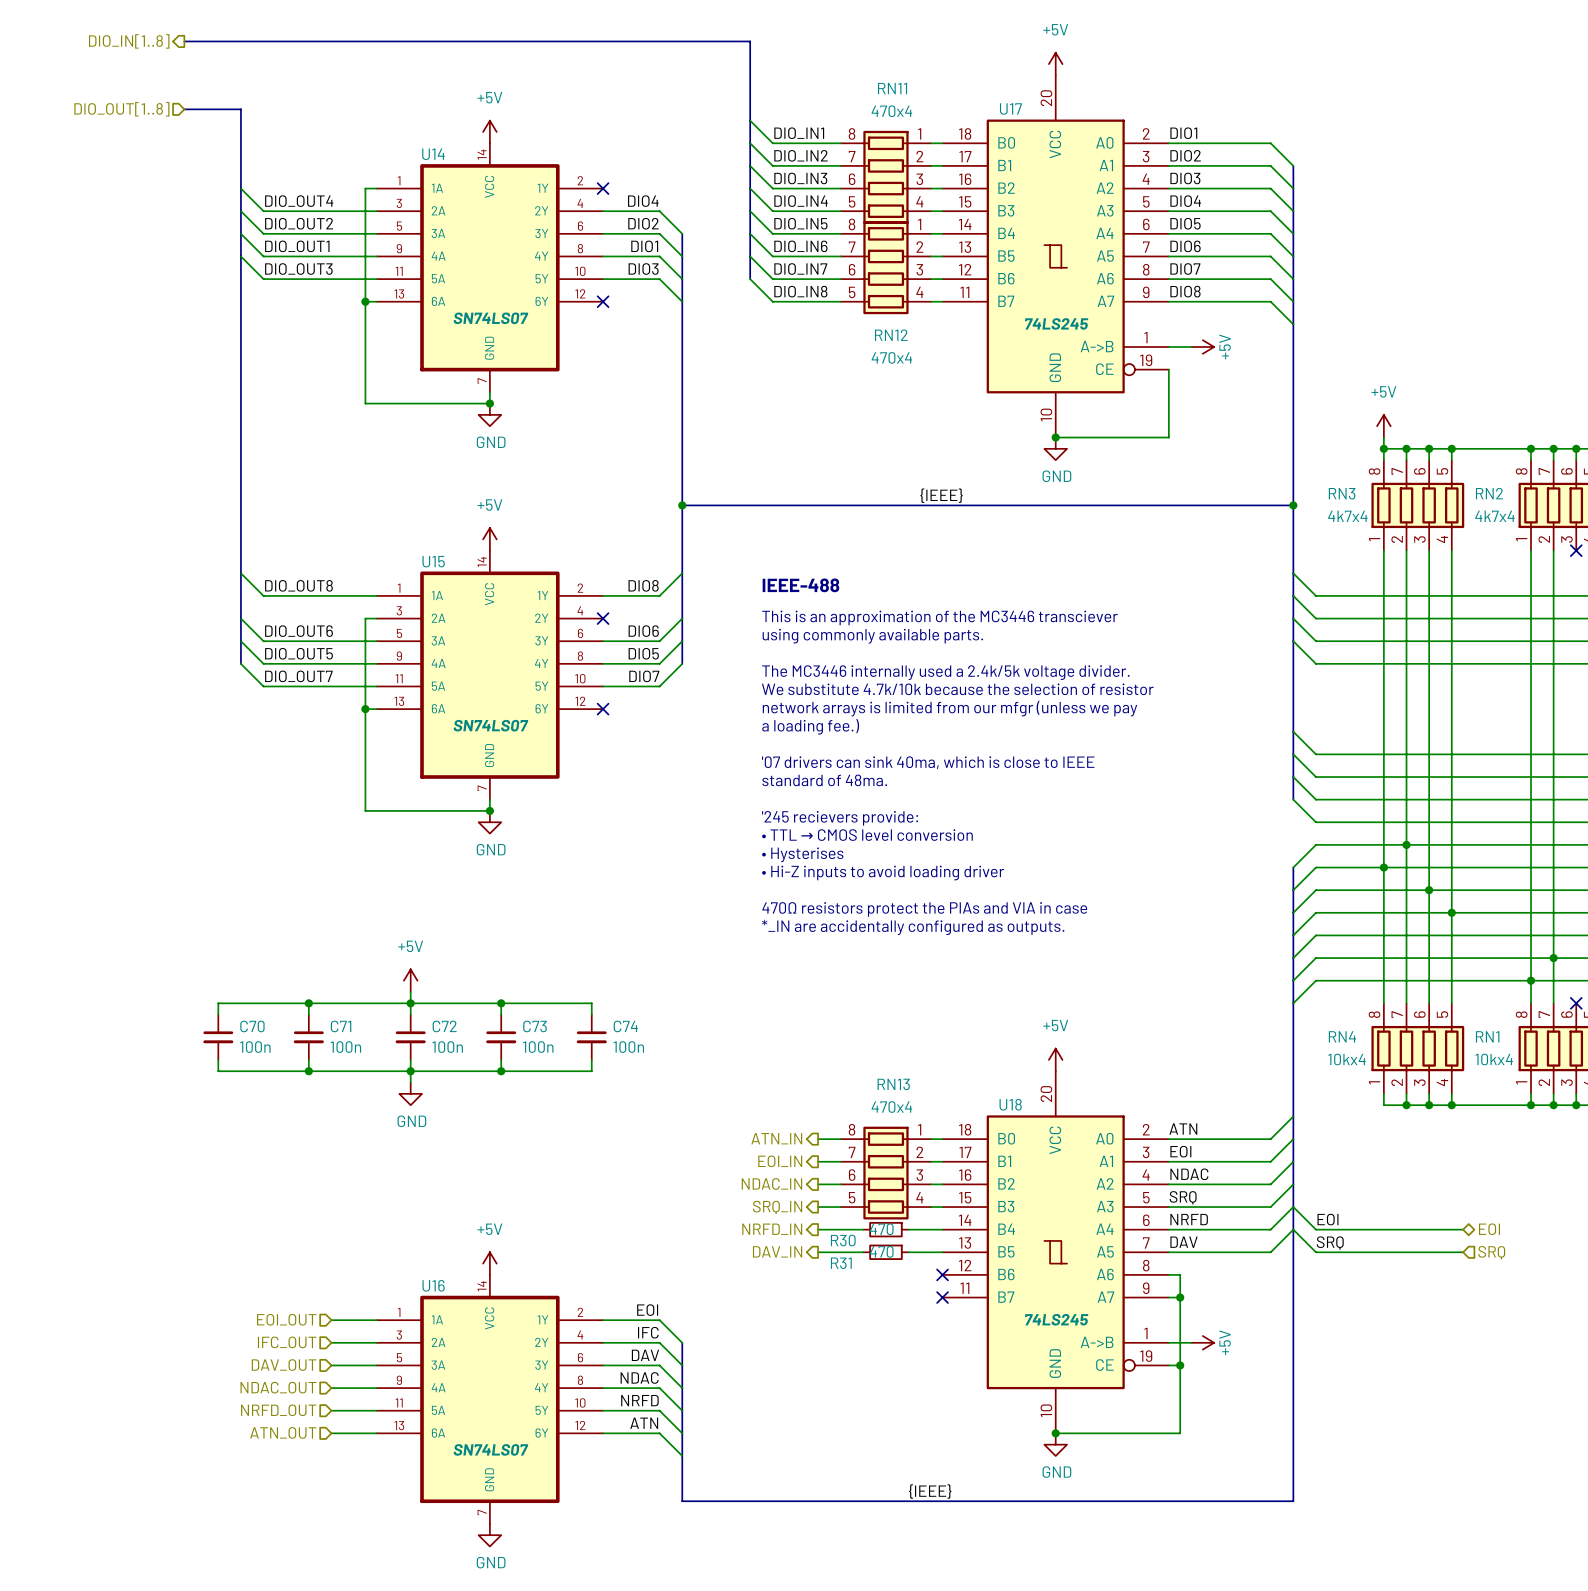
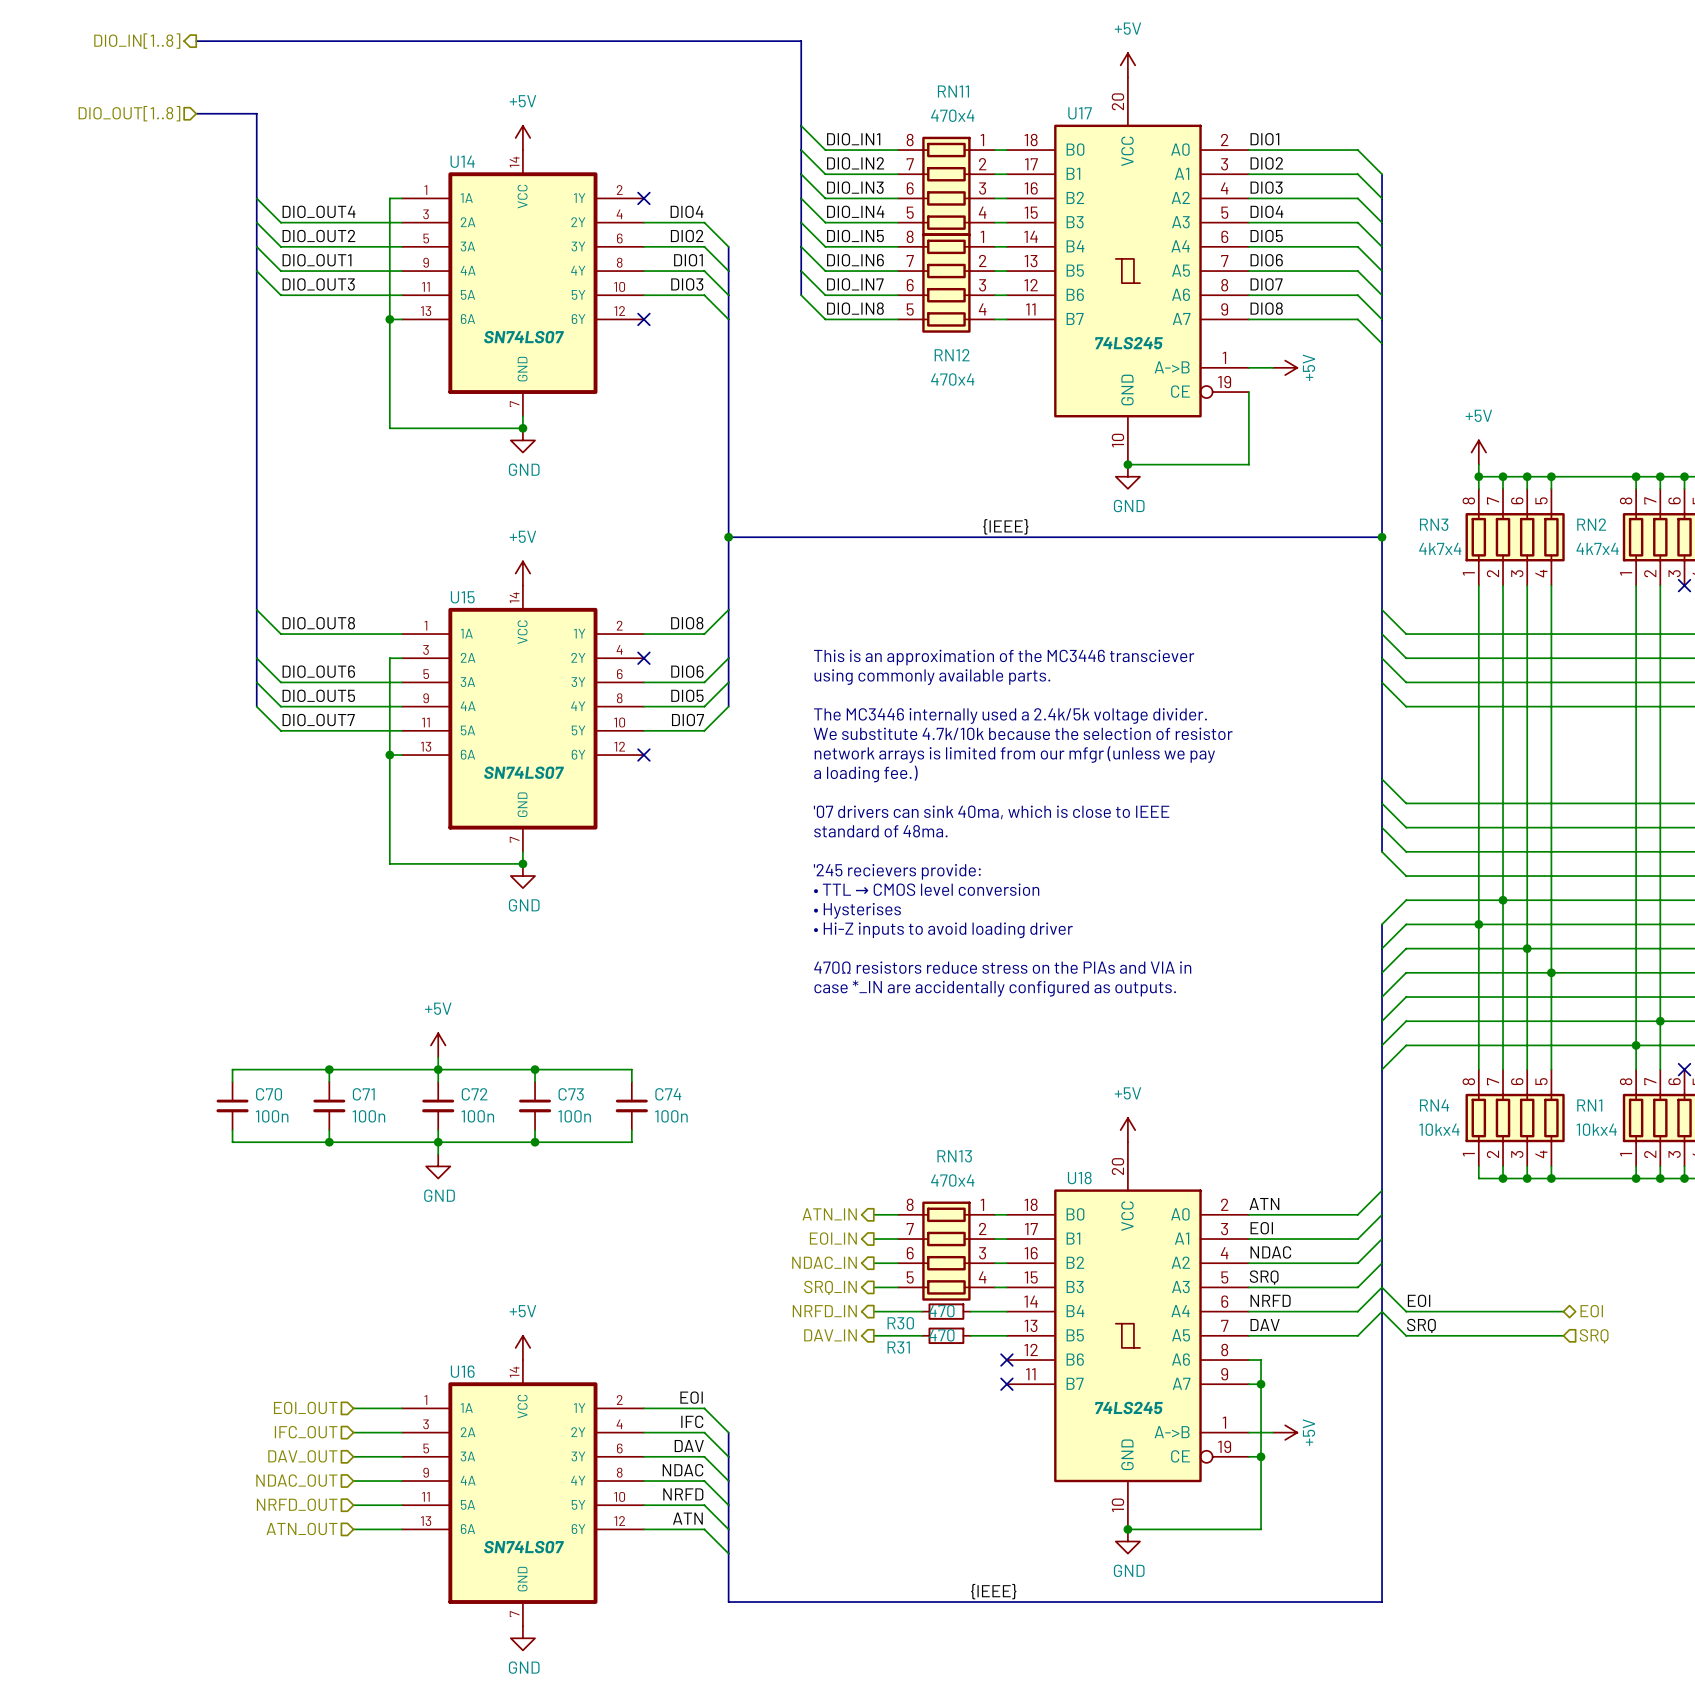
text: IEEE-488 (800, 585) -> none
text: 470Ω resistors protect the PIAs and VIA in case (924, 909) -> 470Ω resistors reduce stress on the PIAs and VIA in (1002, 967)
text: *_IN are accidentally configured as outputs. (913, 927) -> case *_IN are accidentally configured as outputs. (995, 988)

